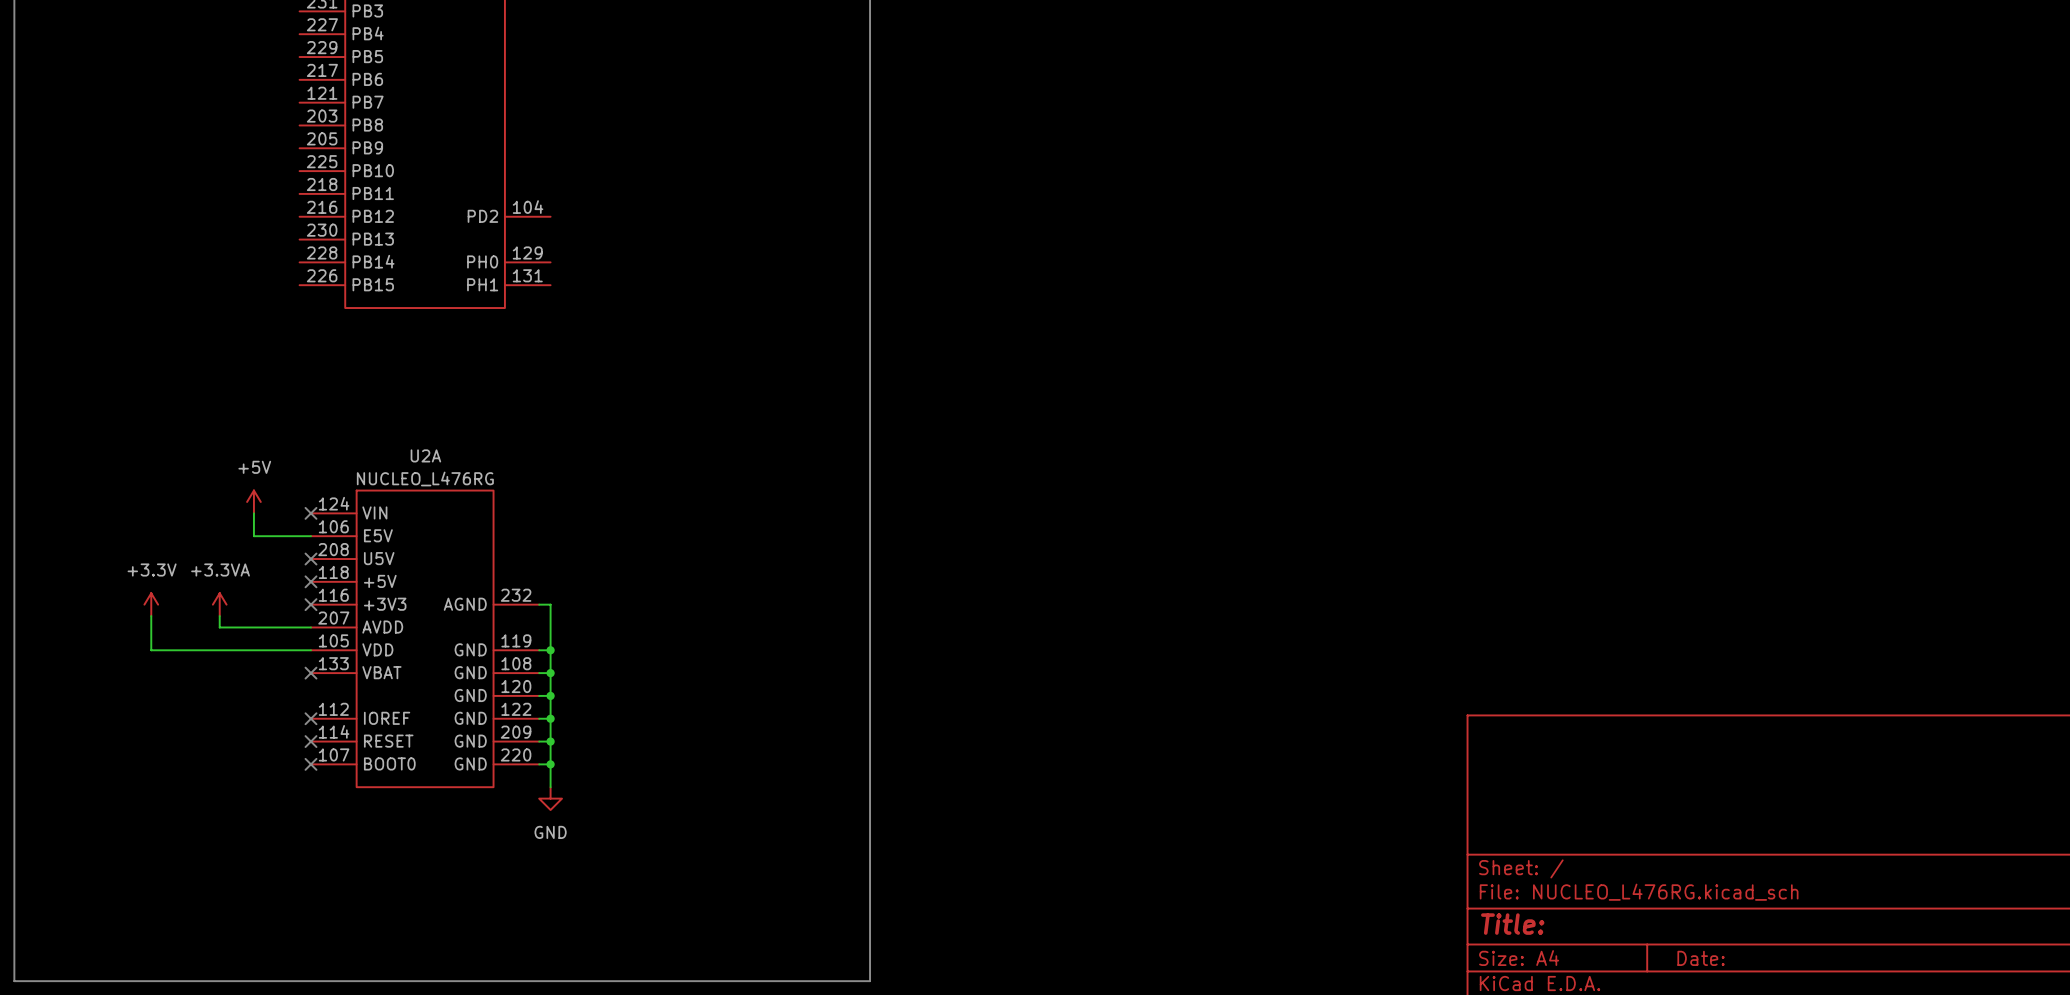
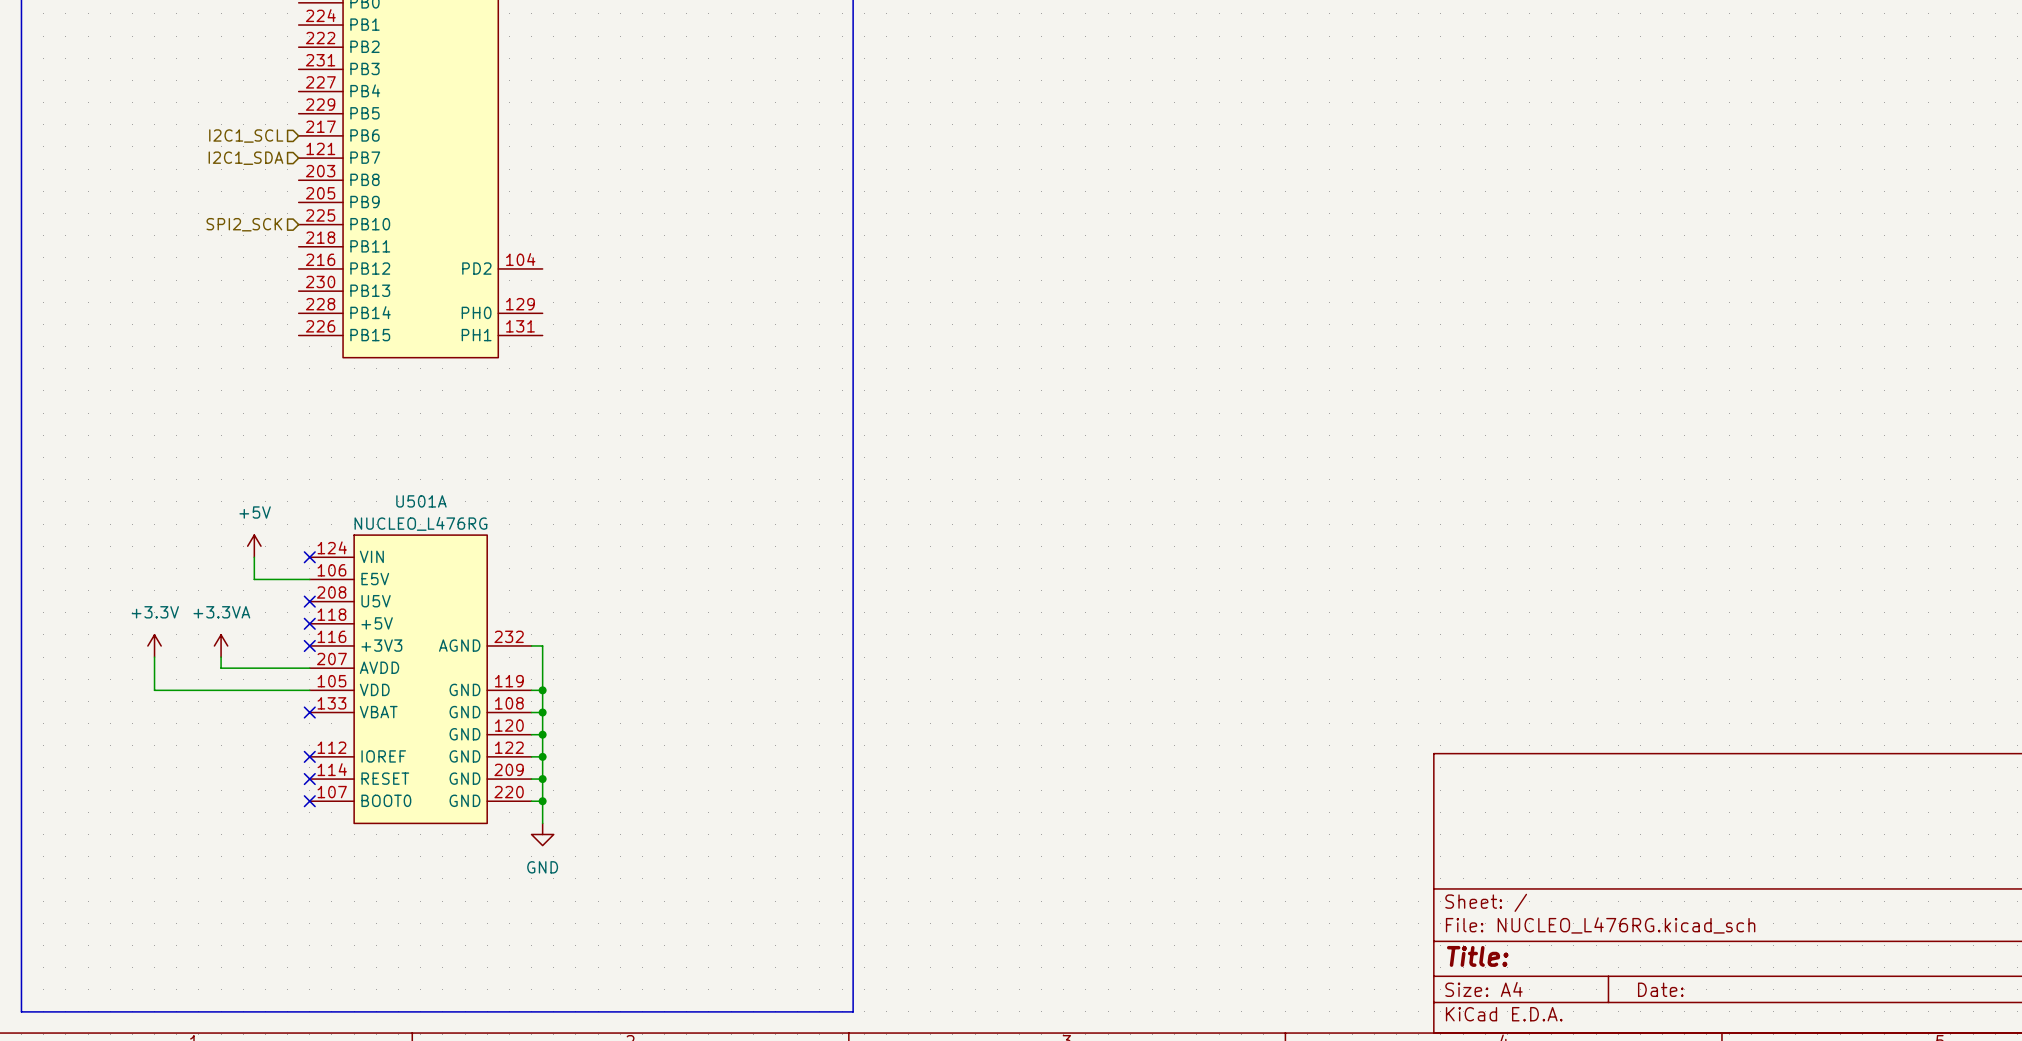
hierarchical label: none -> I2C1_SCL (246, 136)
hierarchical label: none -> I2C1_SDA (245, 158)
hierarchical label: none -> SPI2_SCK (244, 224)
U2A name: U2A (425, 455) -> U501A (421, 501)

